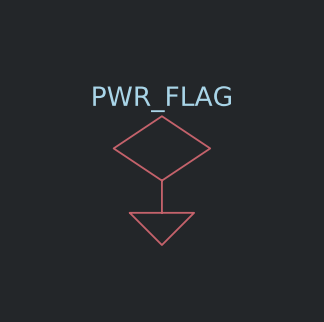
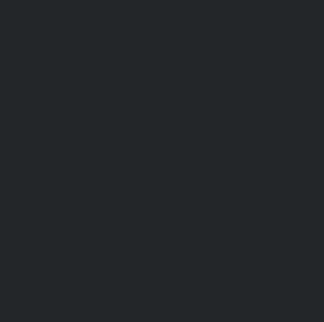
power symbol: PWR_FLAG (161, 164) -> none
power symbol: (161, 228) -> none

